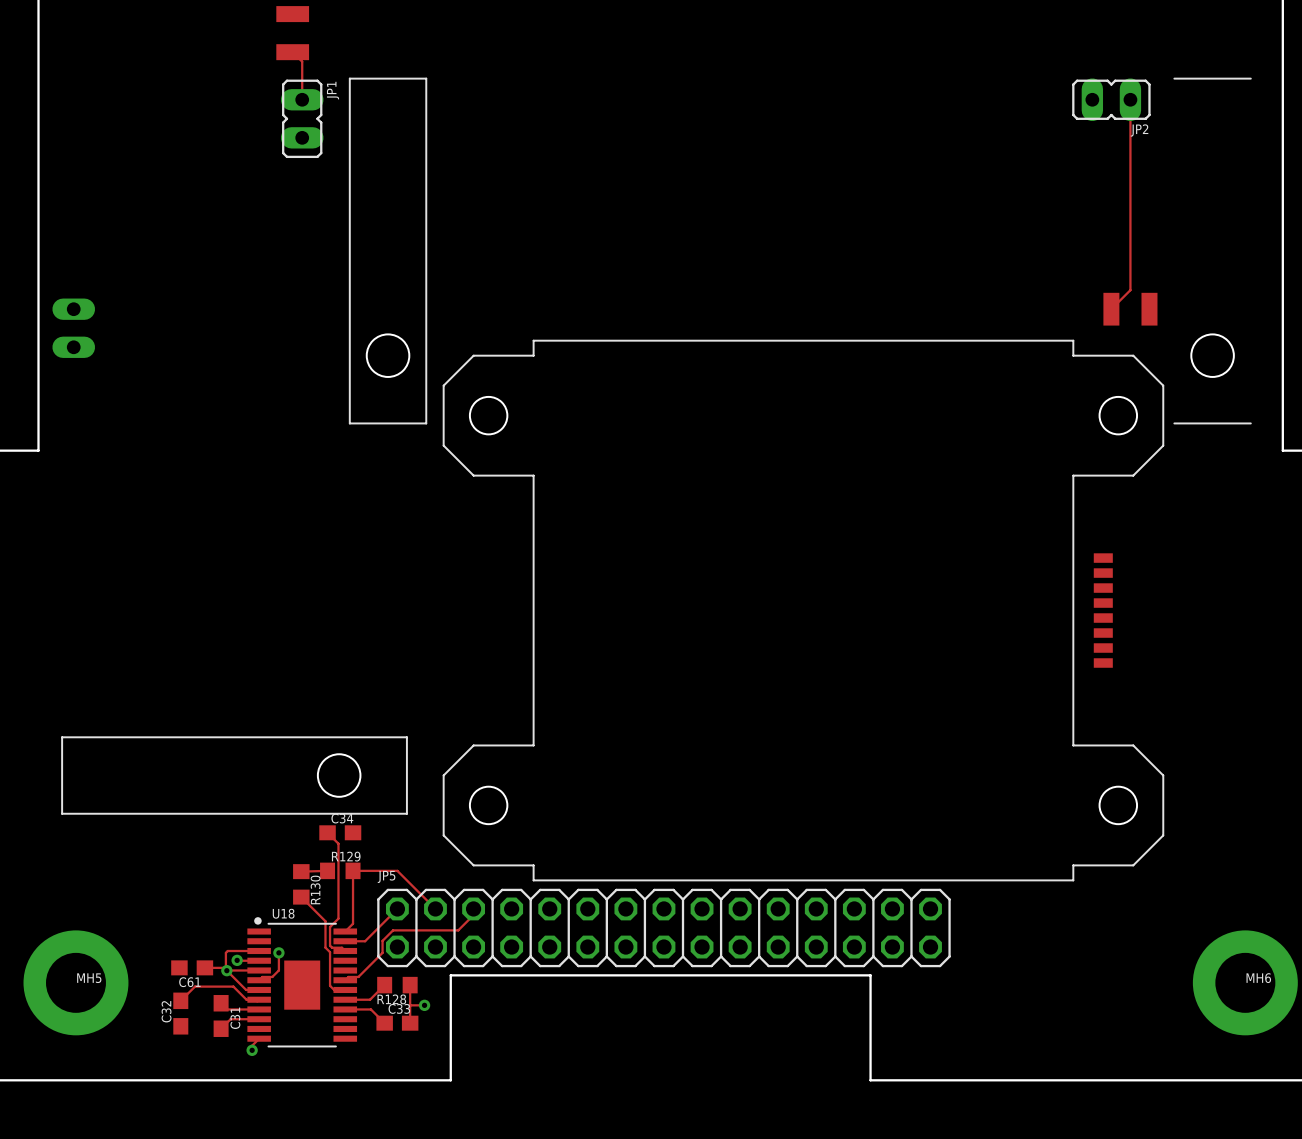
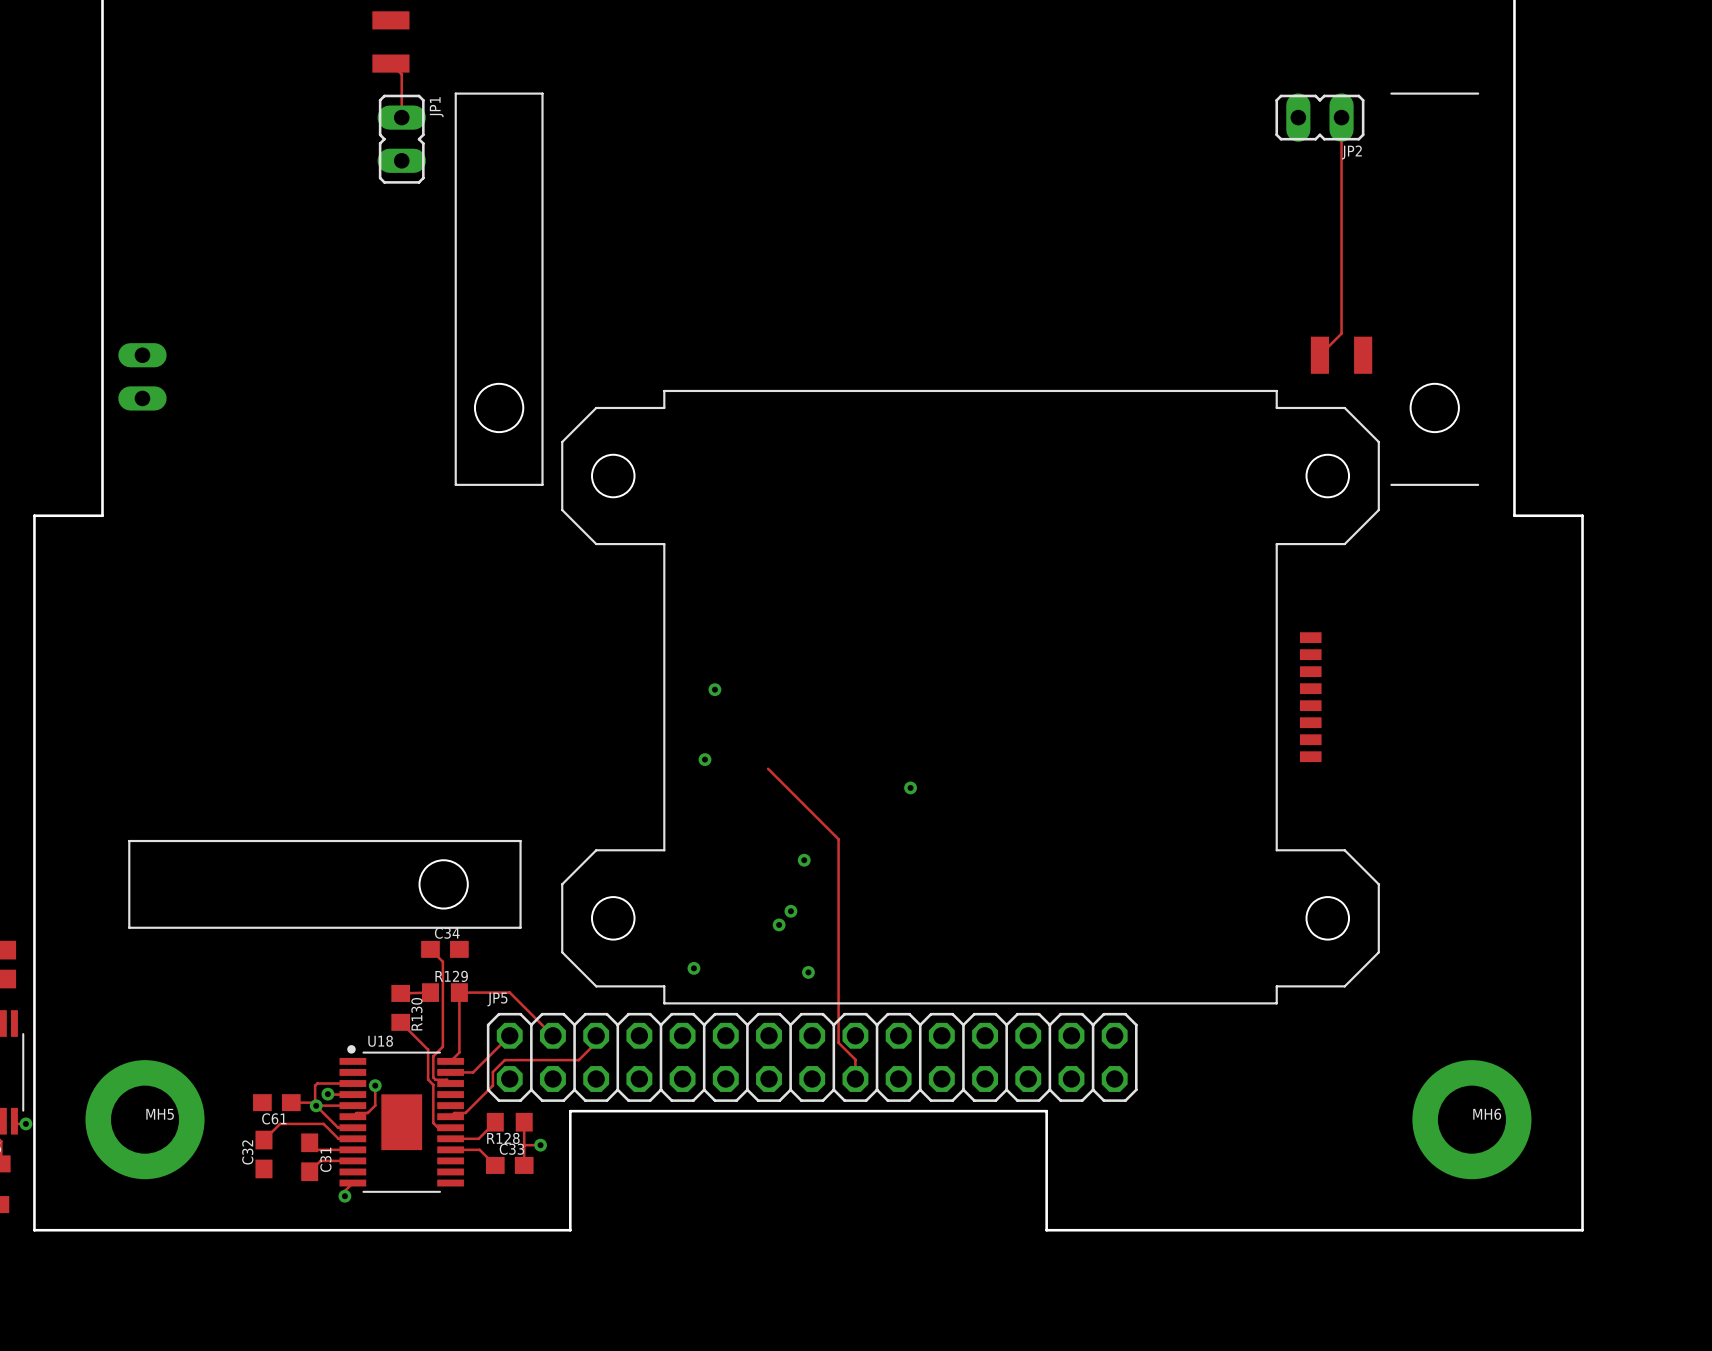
via: none -> (714, 689)
via: none -> (704, 759)
track: none -> (768, 768) (838, 839) (838, 1042) (855, 1059) (855, 1079)
via: none -> (910, 787)
via: none -> (804, 860)
via: none -> (790, 911)
via: none -> (779, 924)
via: none -> (693, 968)
via: none -> (808, 972)

